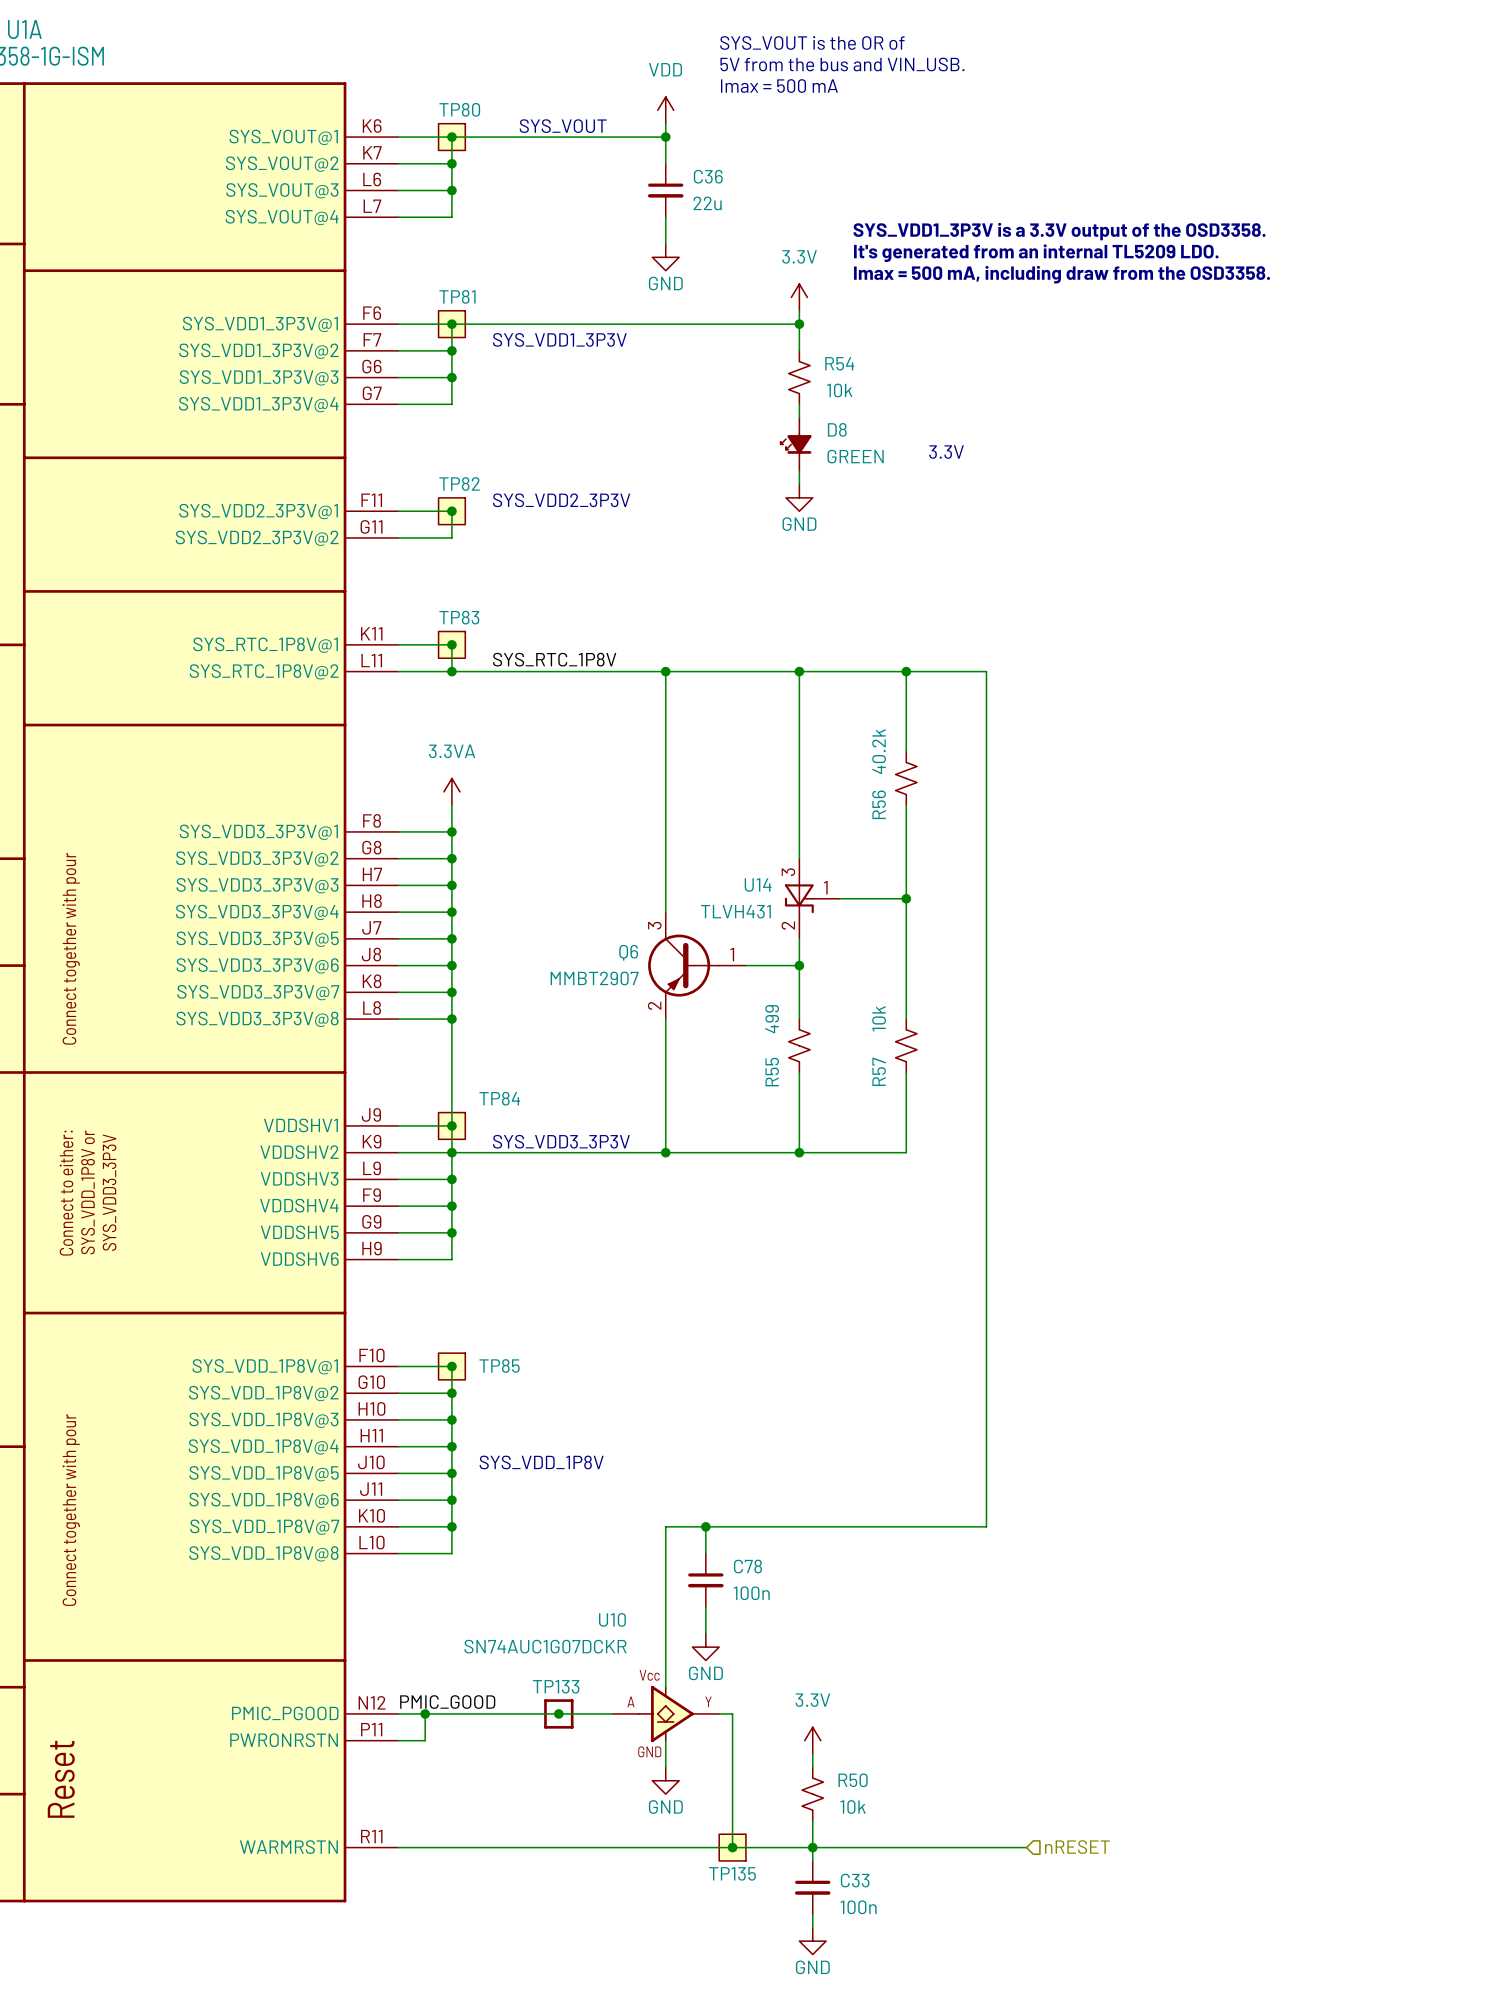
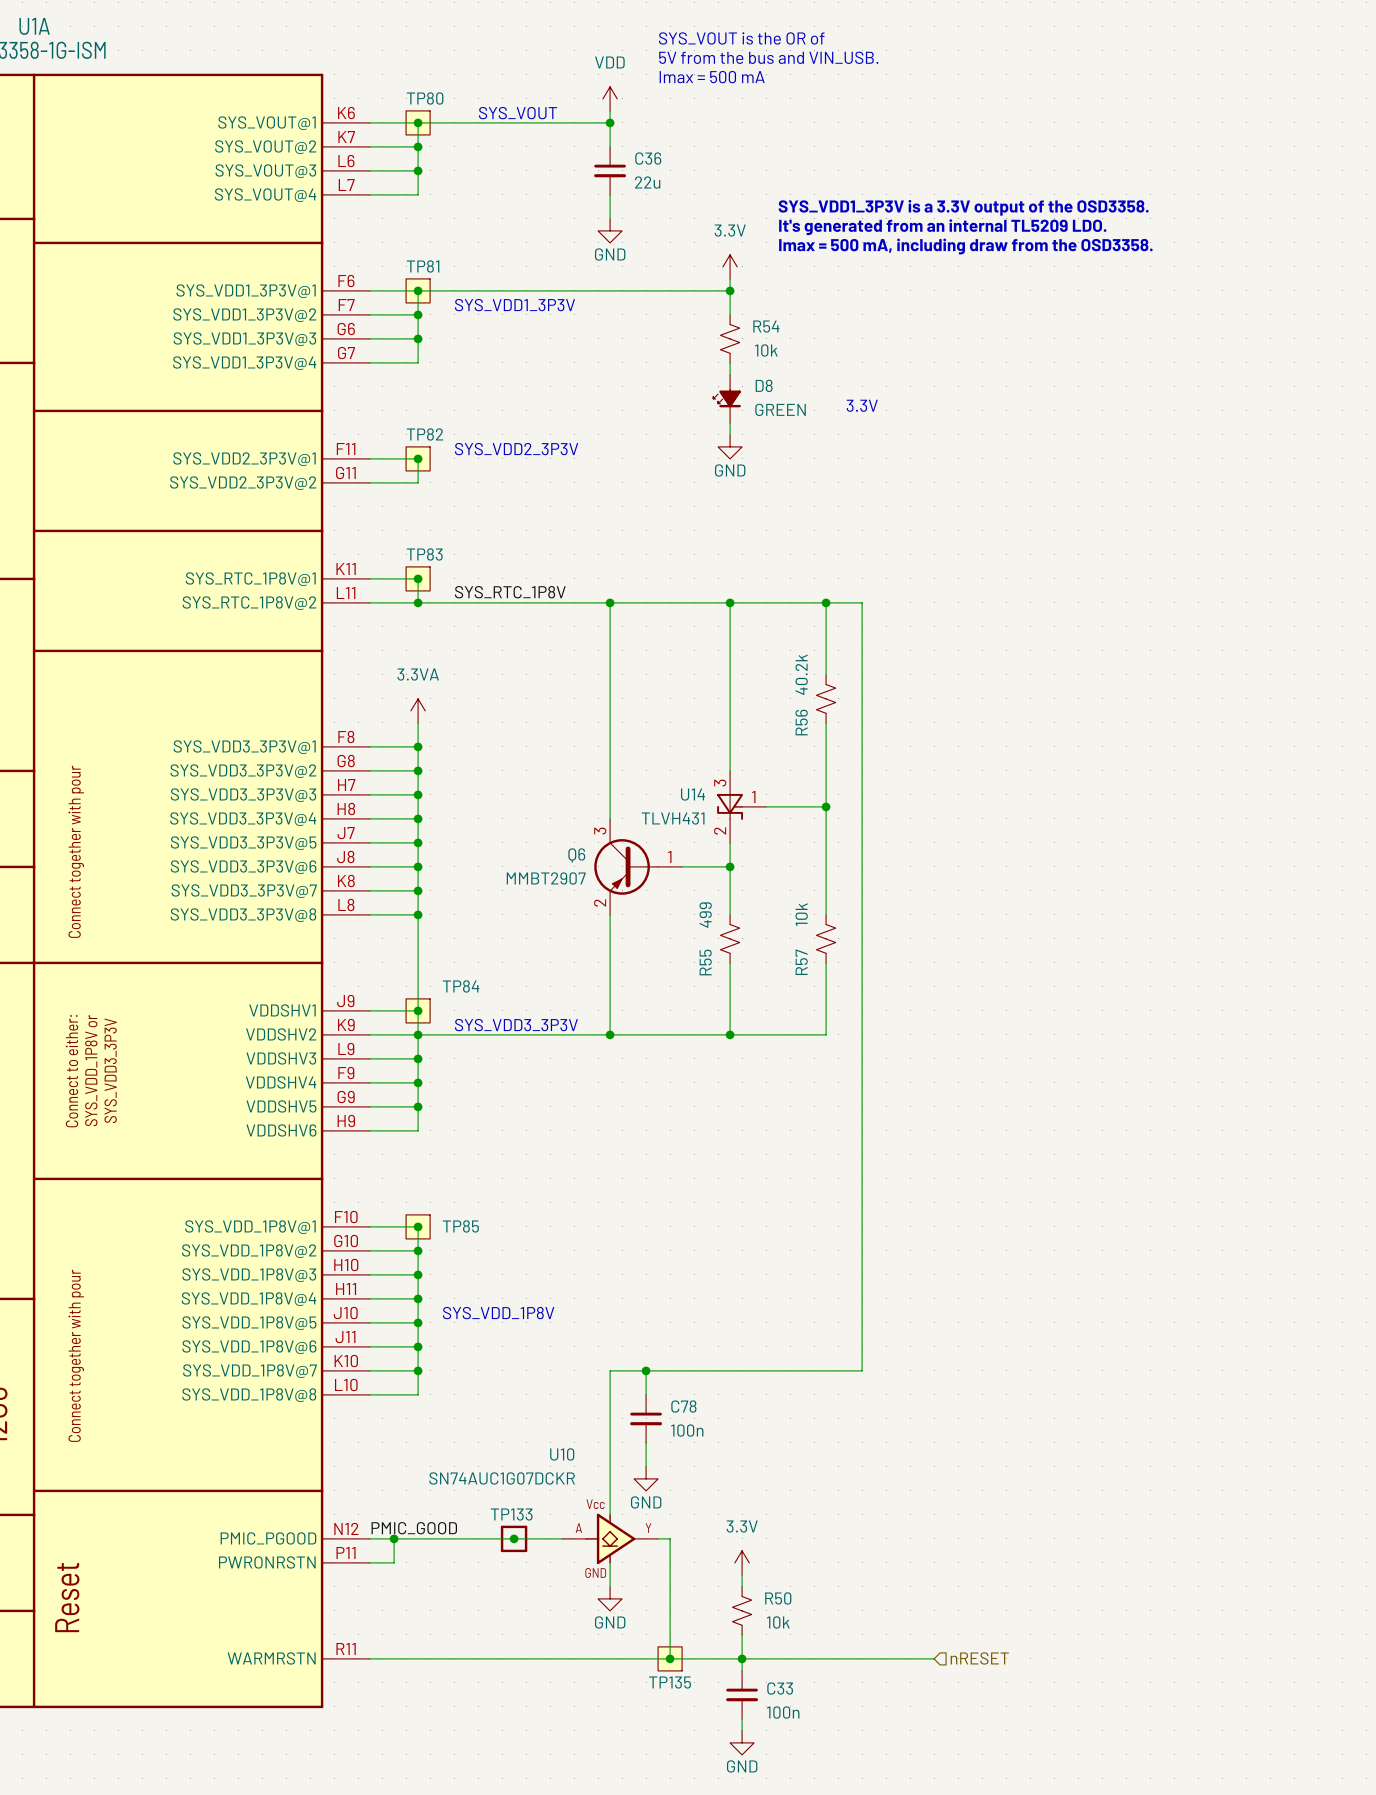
wire: (946, 671) (986, 671) (986, 1526) (946, 1526) -> (862, 602) (862, 1370)

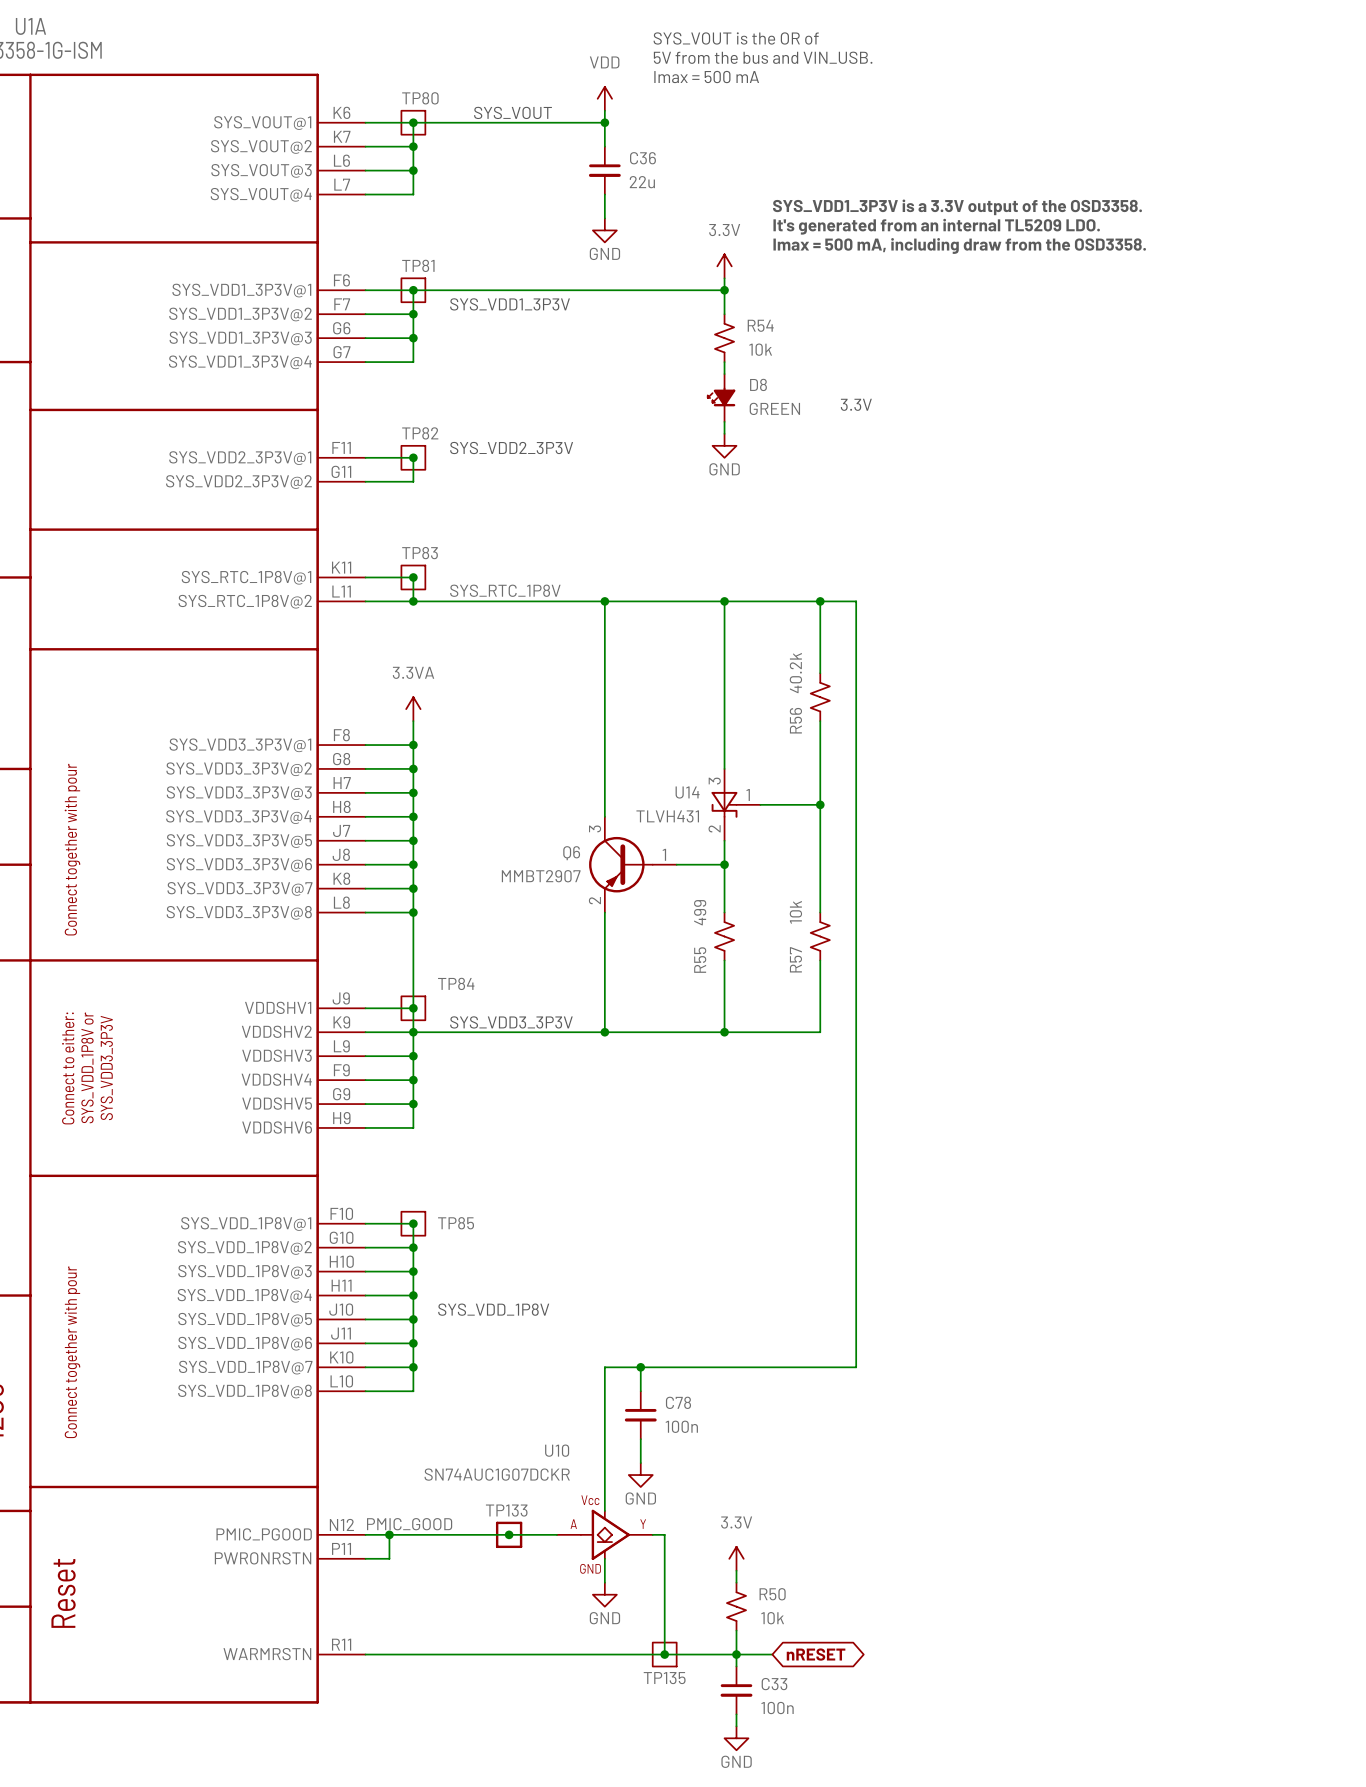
wire: (778, 1658) (934, 1658) -> none
global label: none -> nRESET (816, 1654)
hierarchical label: nRESET (979, 1658) -> none

